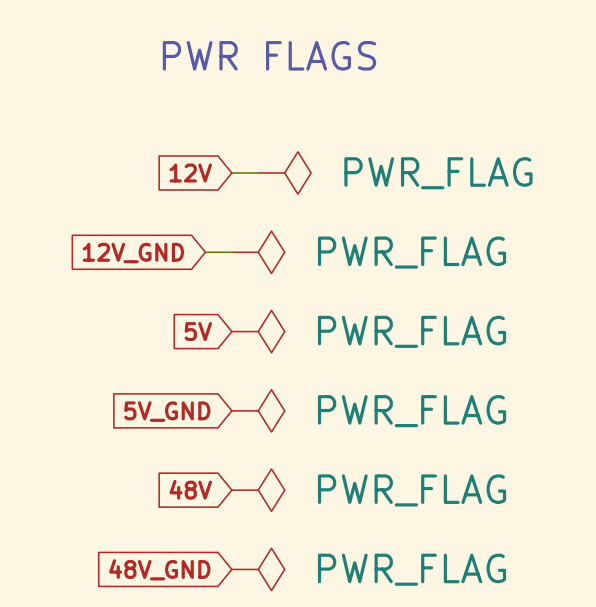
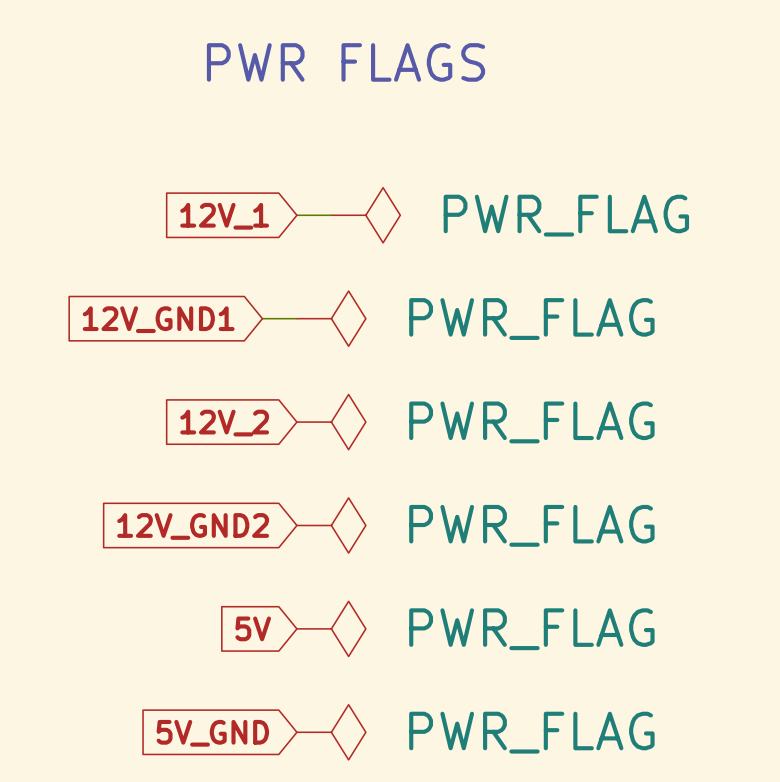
global label: 12V (190, 173) -> 12V_1 (224, 216)
global label: 12V_GND (133, 253) -> 12V_GND1 (158, 319)
global label: 5V (198, 331) -> 12V_2 (224, 423)
global label: 5V_GND (167, 411) -> 12V_GND2 (193, 526)
global label: 48V (190, 489) -> 5V (253, 628)
global label: 48V_GND (159, 569) -> 5V_GND (212, 733)

